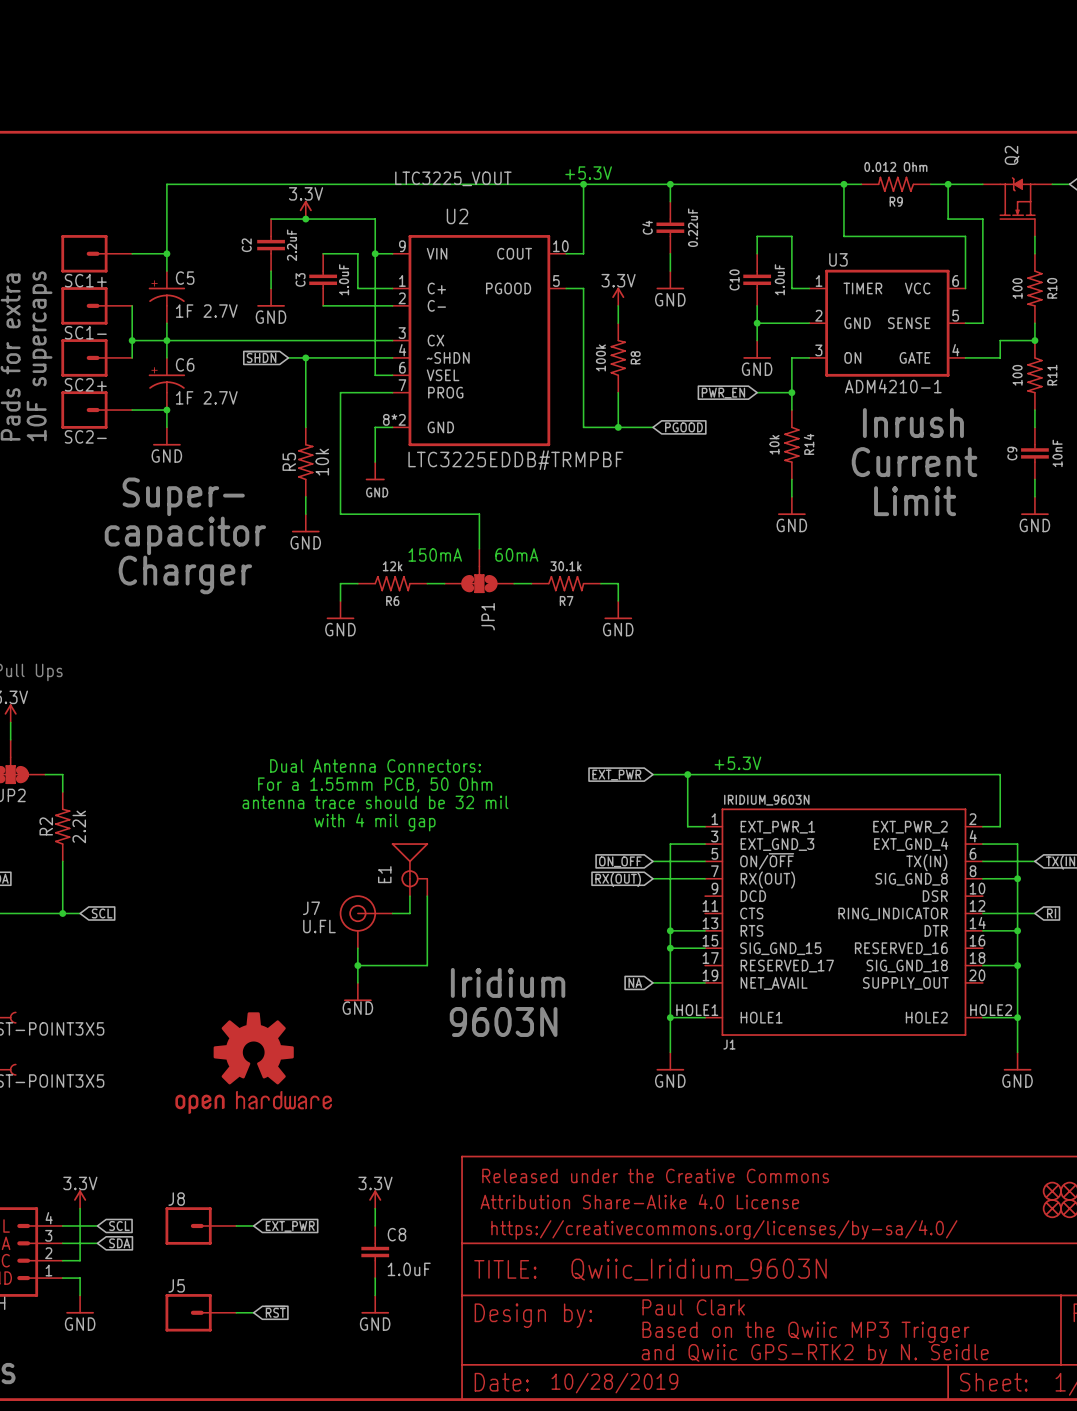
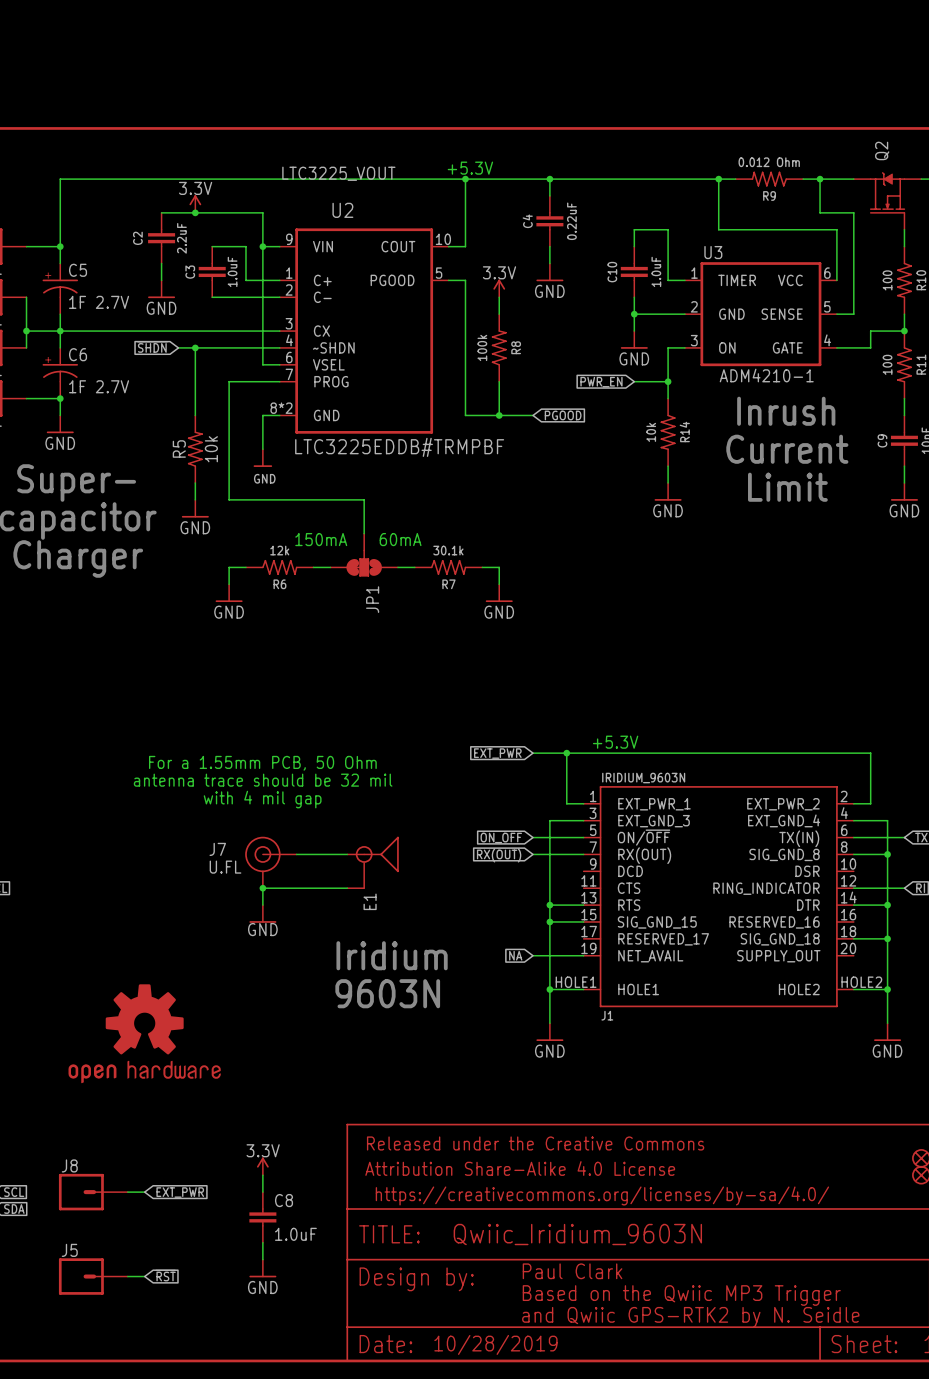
text: Dual Antenna Connectors: (375, 765) -> none
E1 symbol: [391, 843, 429, 897] -> [347, 836, 399, 889]
E1 name position: E1 (384, 874) -> E1 (370, 901)
wire: none -> (296, 854) (347, 854)
wire: (409, 896) (409, 913) -> (347, 888) (296, 888)
wire: (427, 896) (427, 965) (357, 965) -> none
junction: none -> (262, 888)
J7 position: (366, 921) -> (270, 862)
wire: (357, 948) (357, 982) -> none
junction: (357, 965) -> none
power symbol position: GND (357, 992) -> GND (262, 913)

